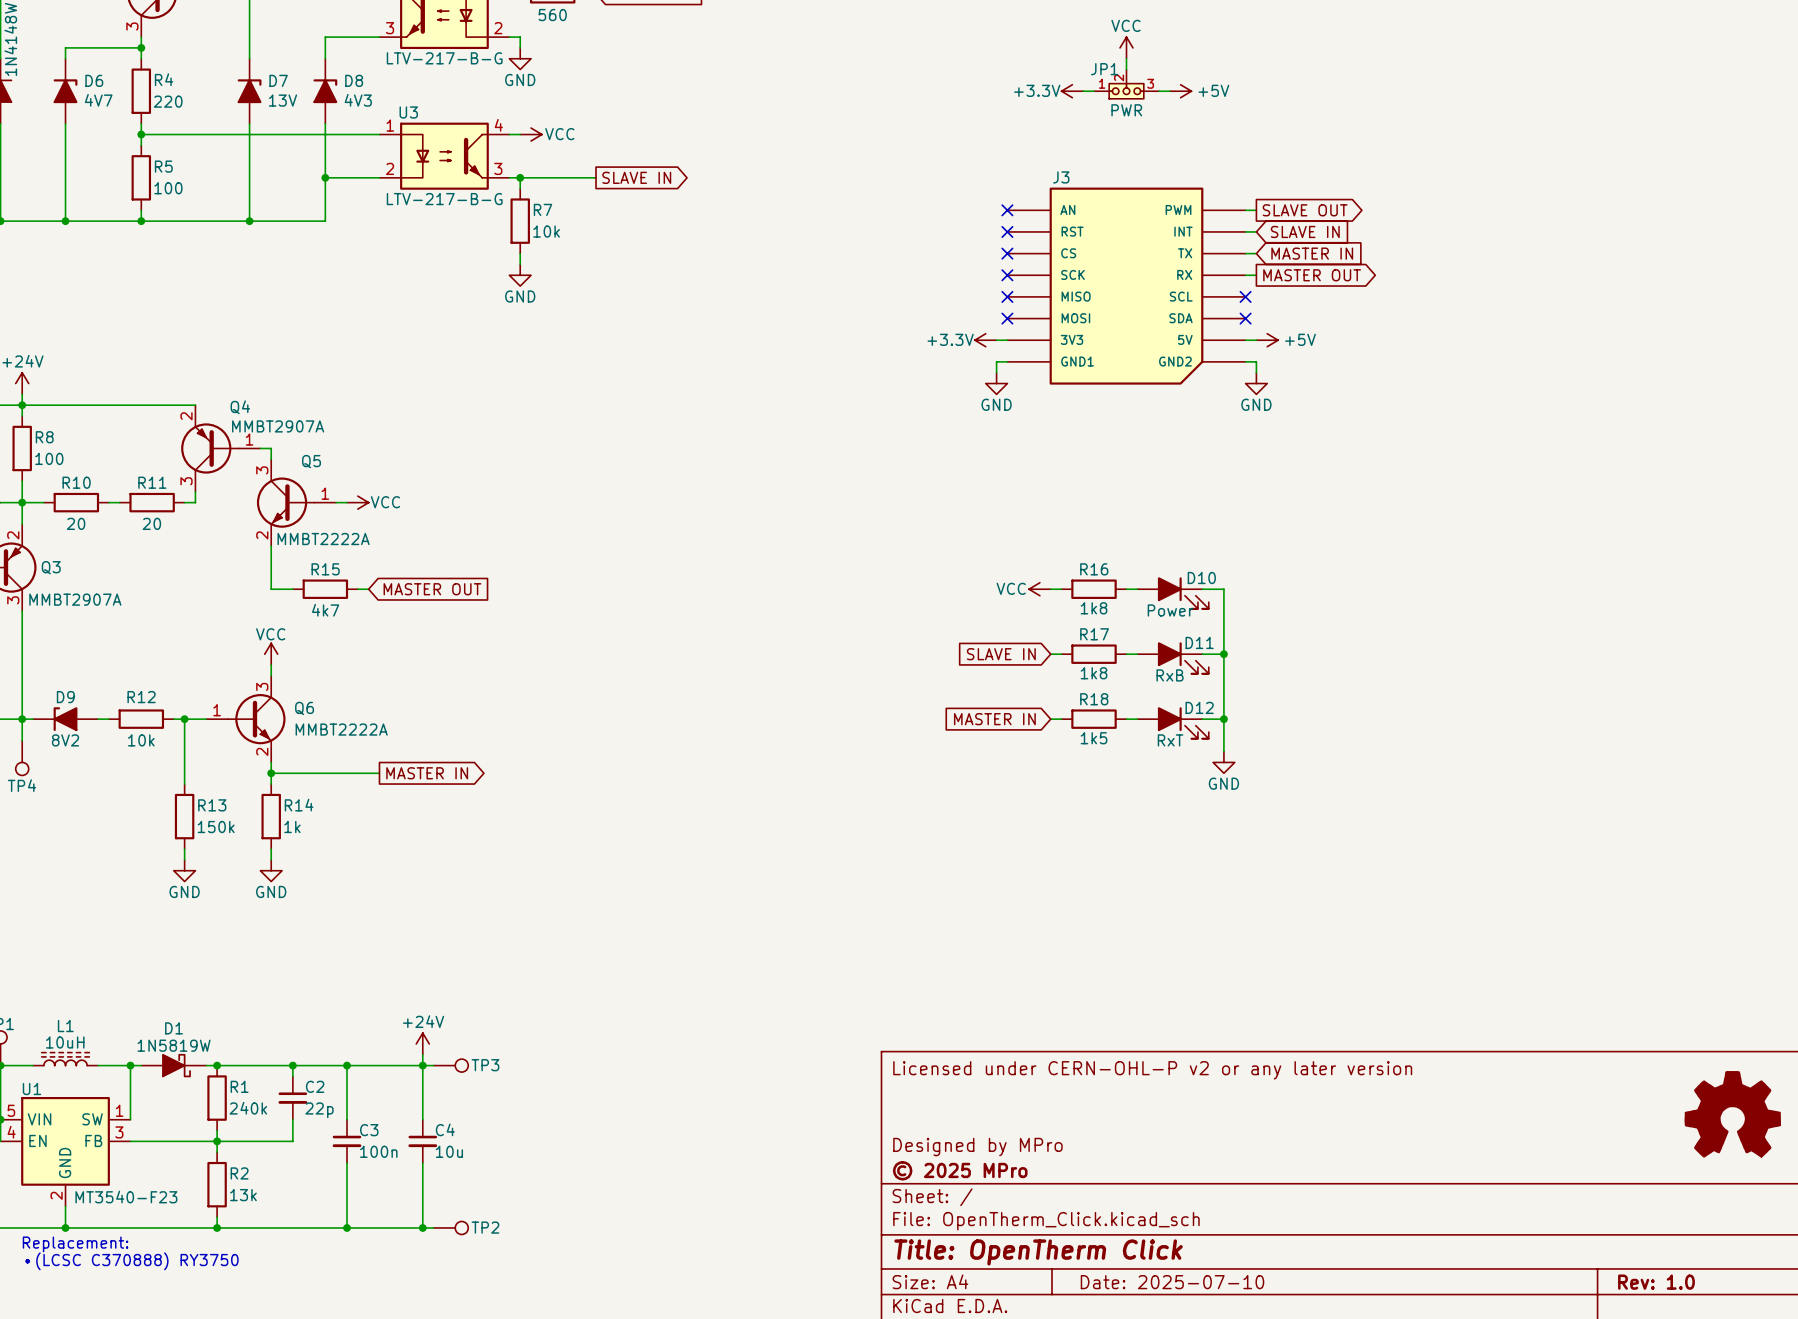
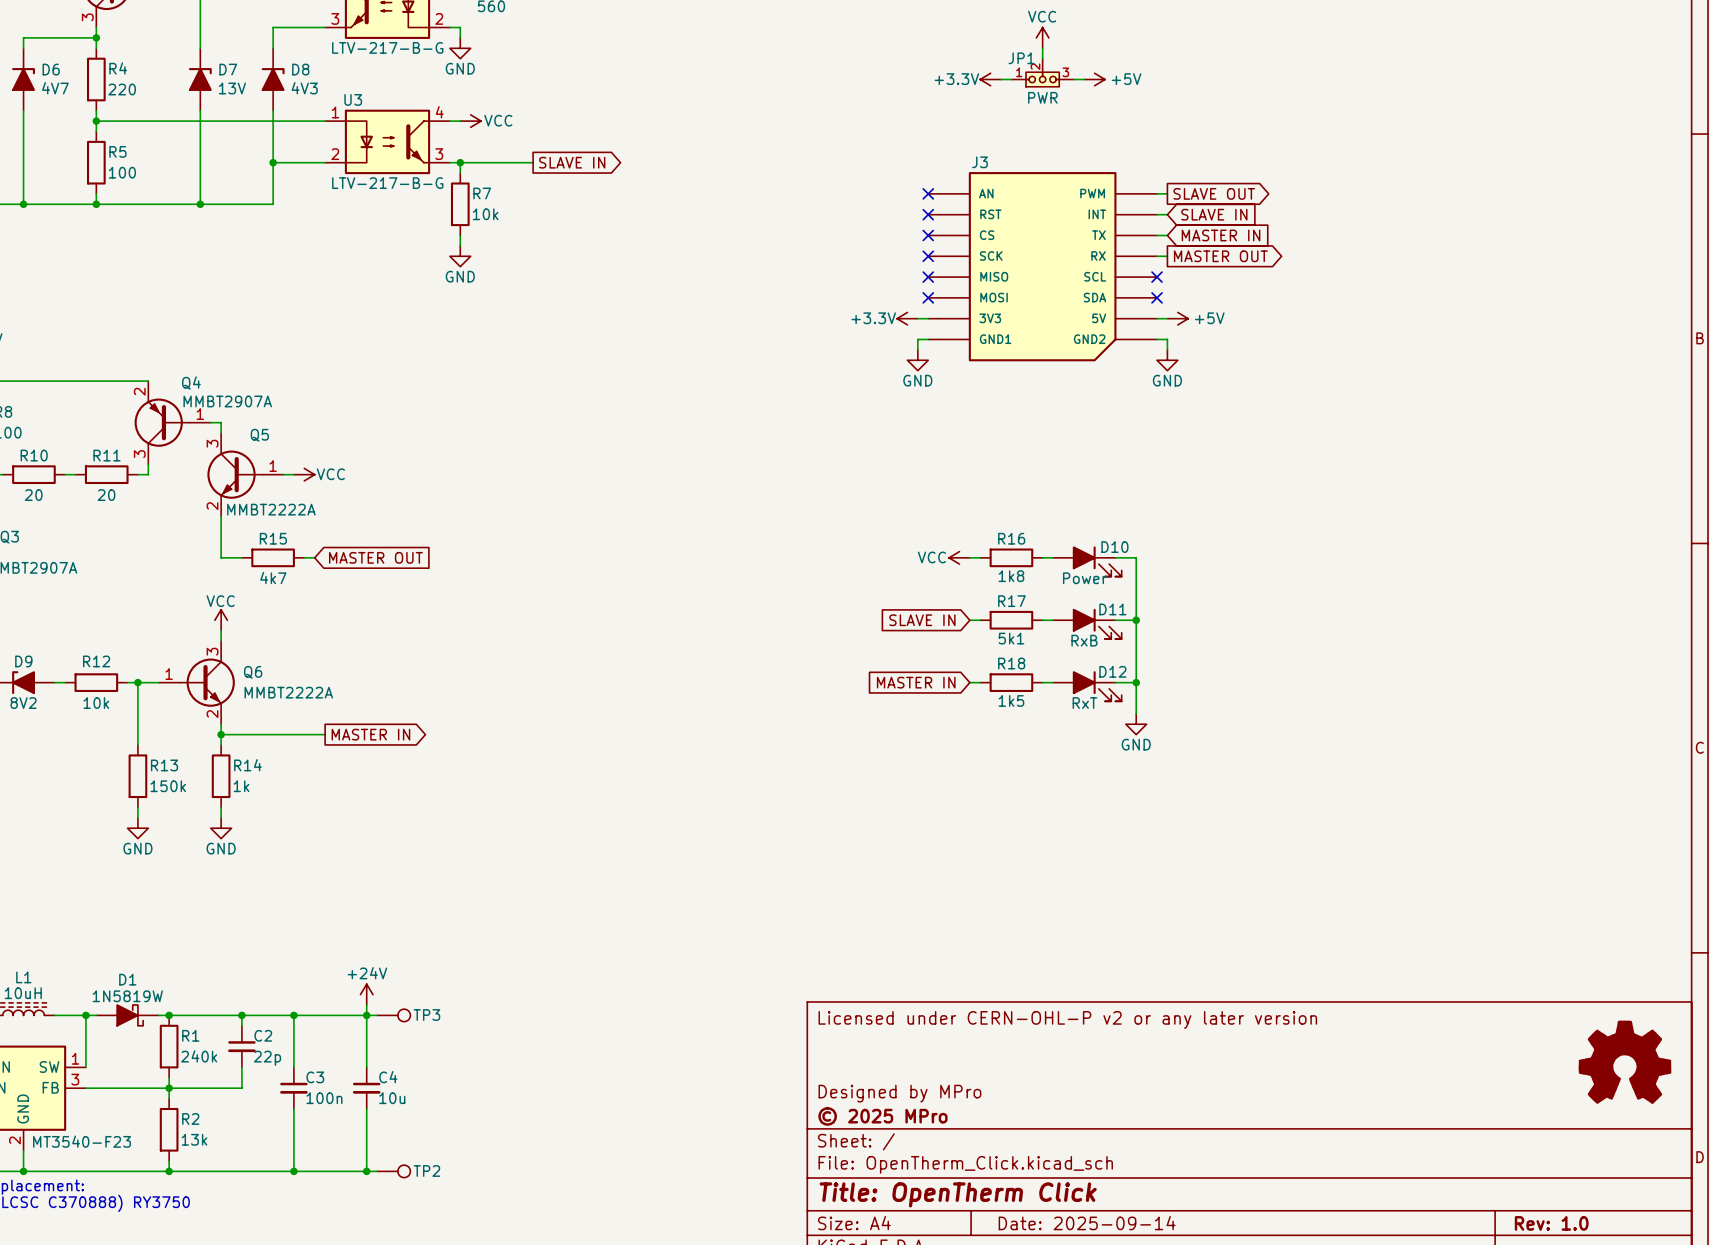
R17 value: 1k8 (1094, 673) -> 5k1 (1011, 638)
title block: Date: 2025-07-10 (1172, 1282) -> Date: 2025-09-14 (1087, 1223)

